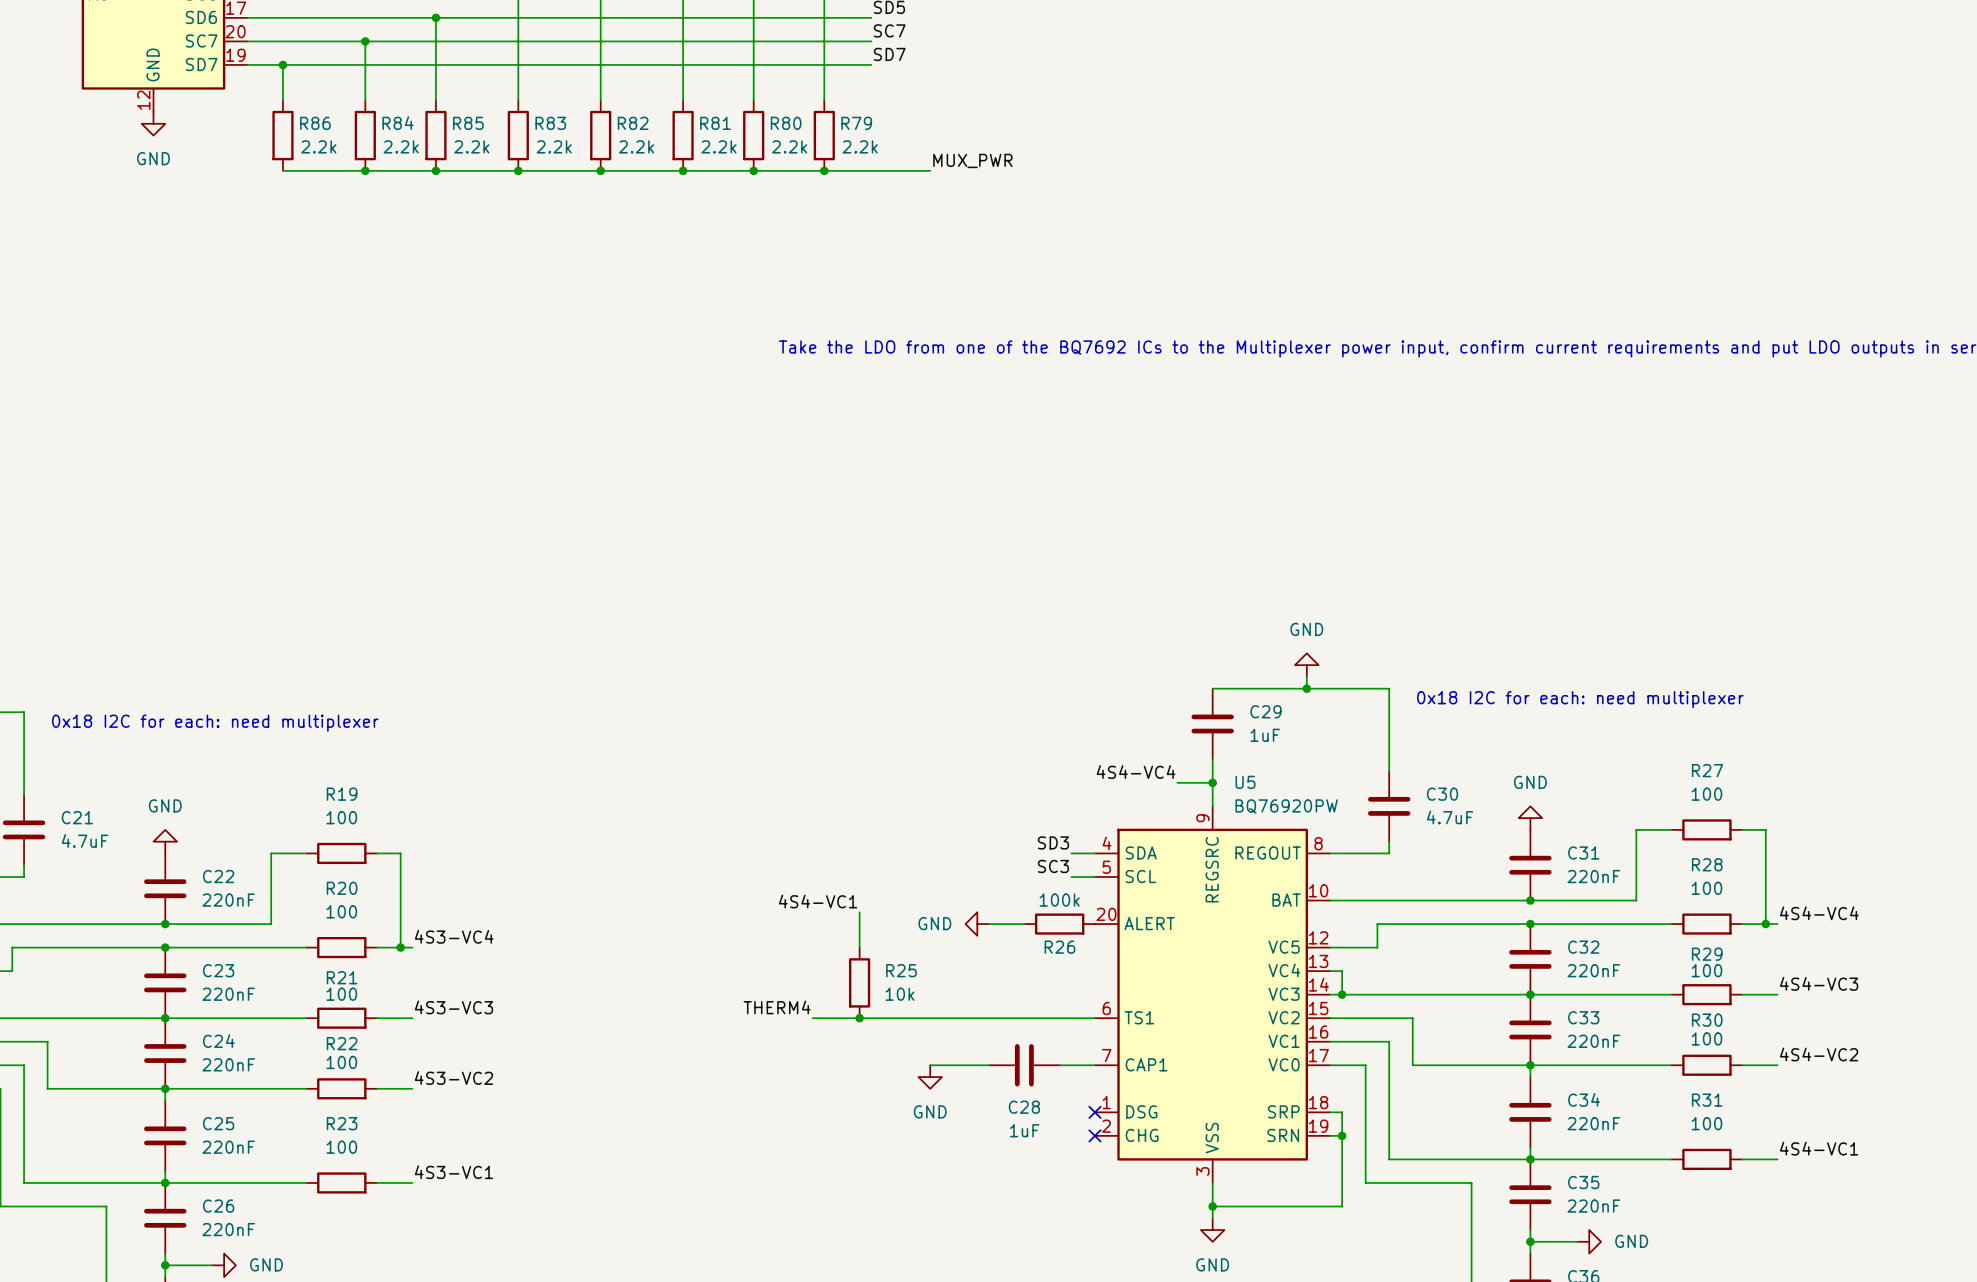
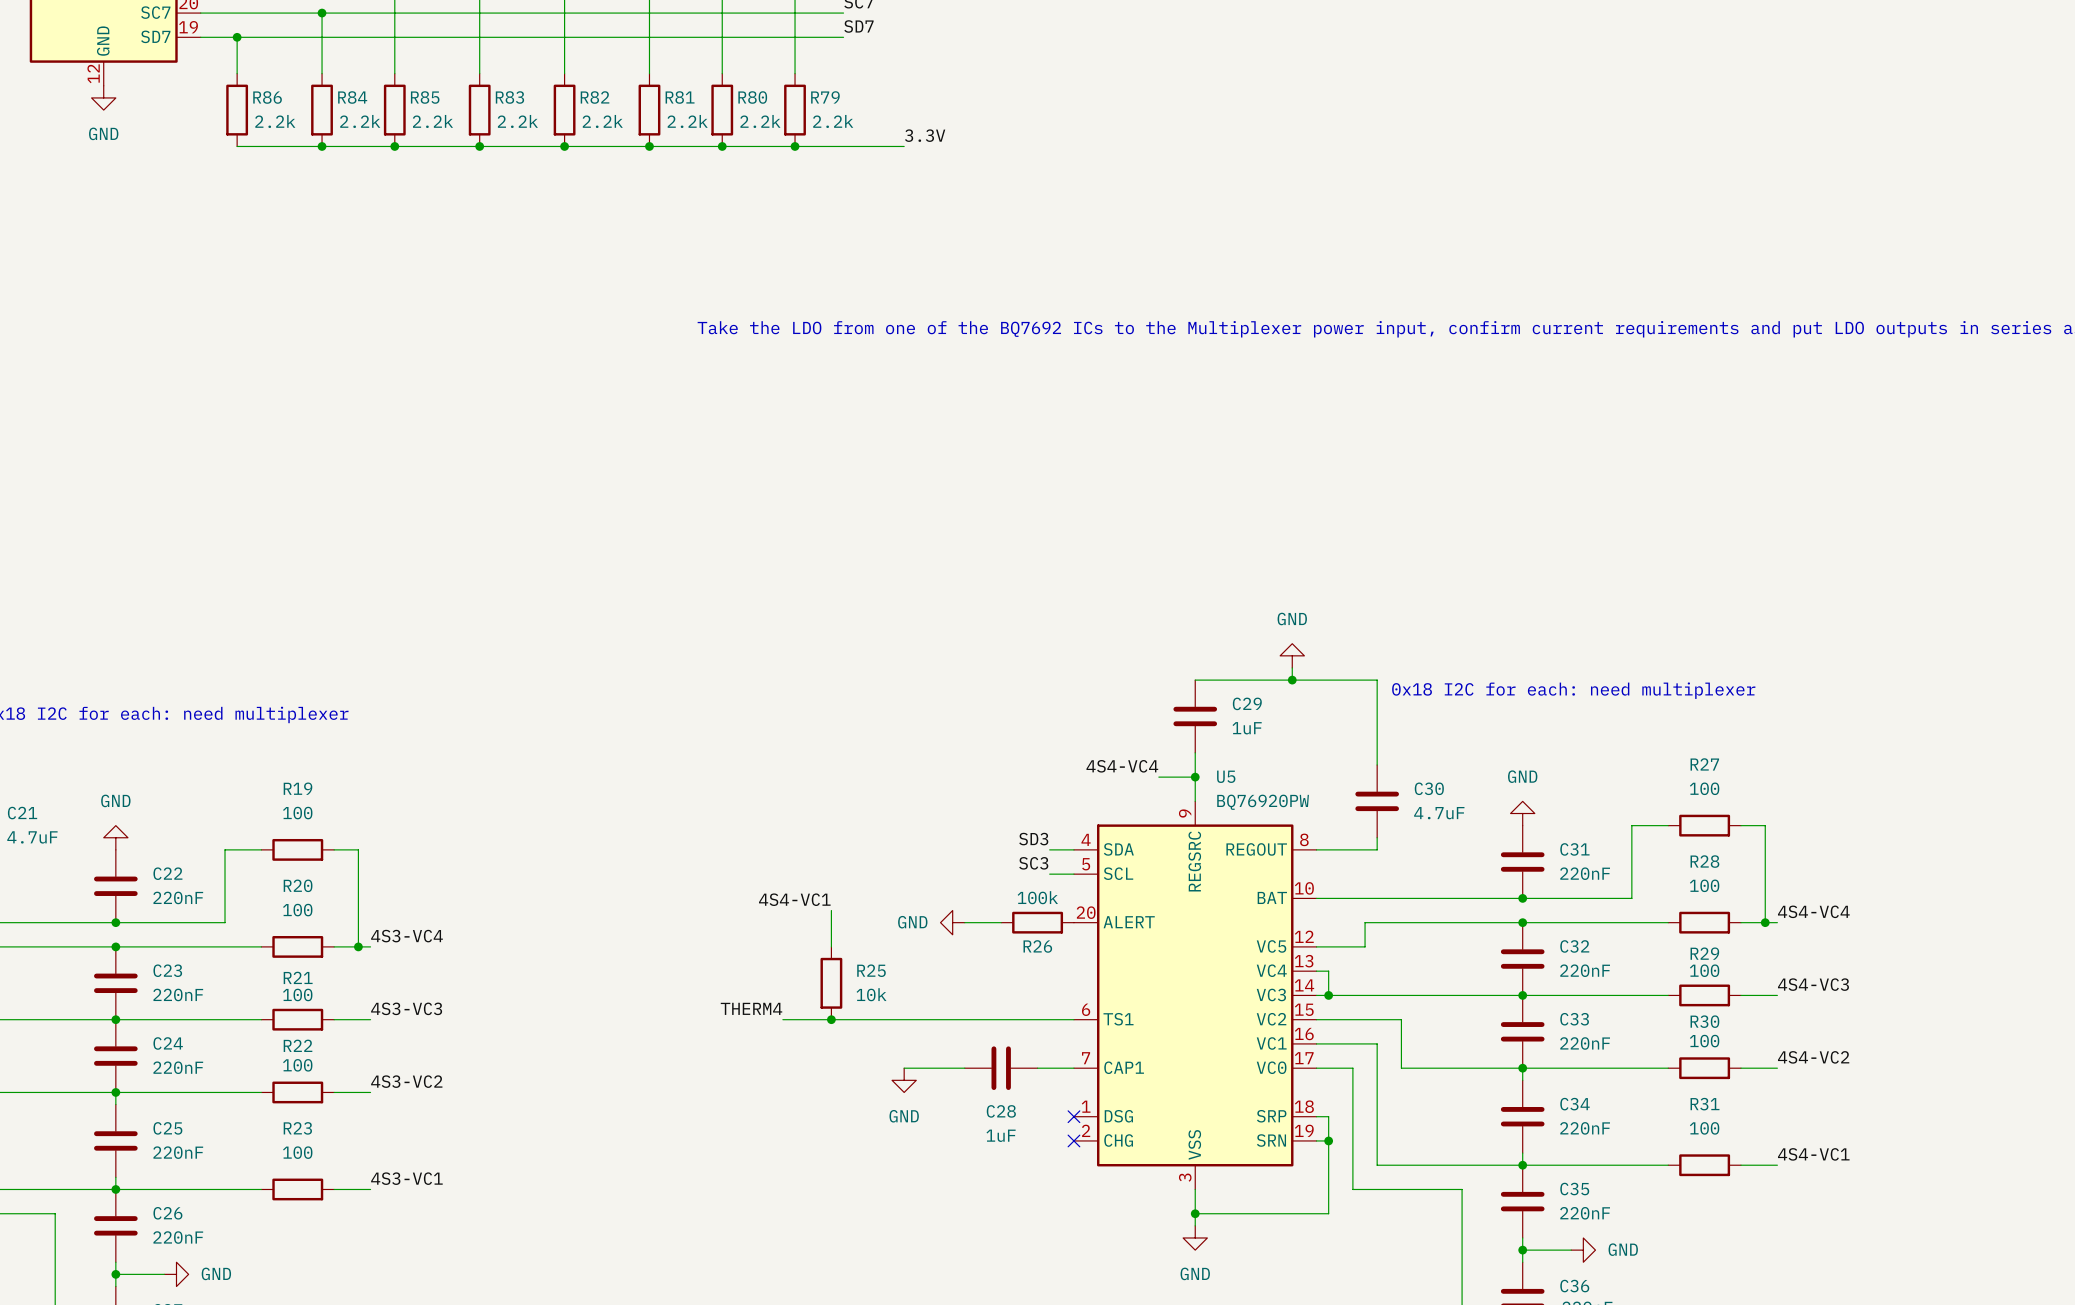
label: MUX_PWR (972, 160) -> 3.3V (925, 135)

